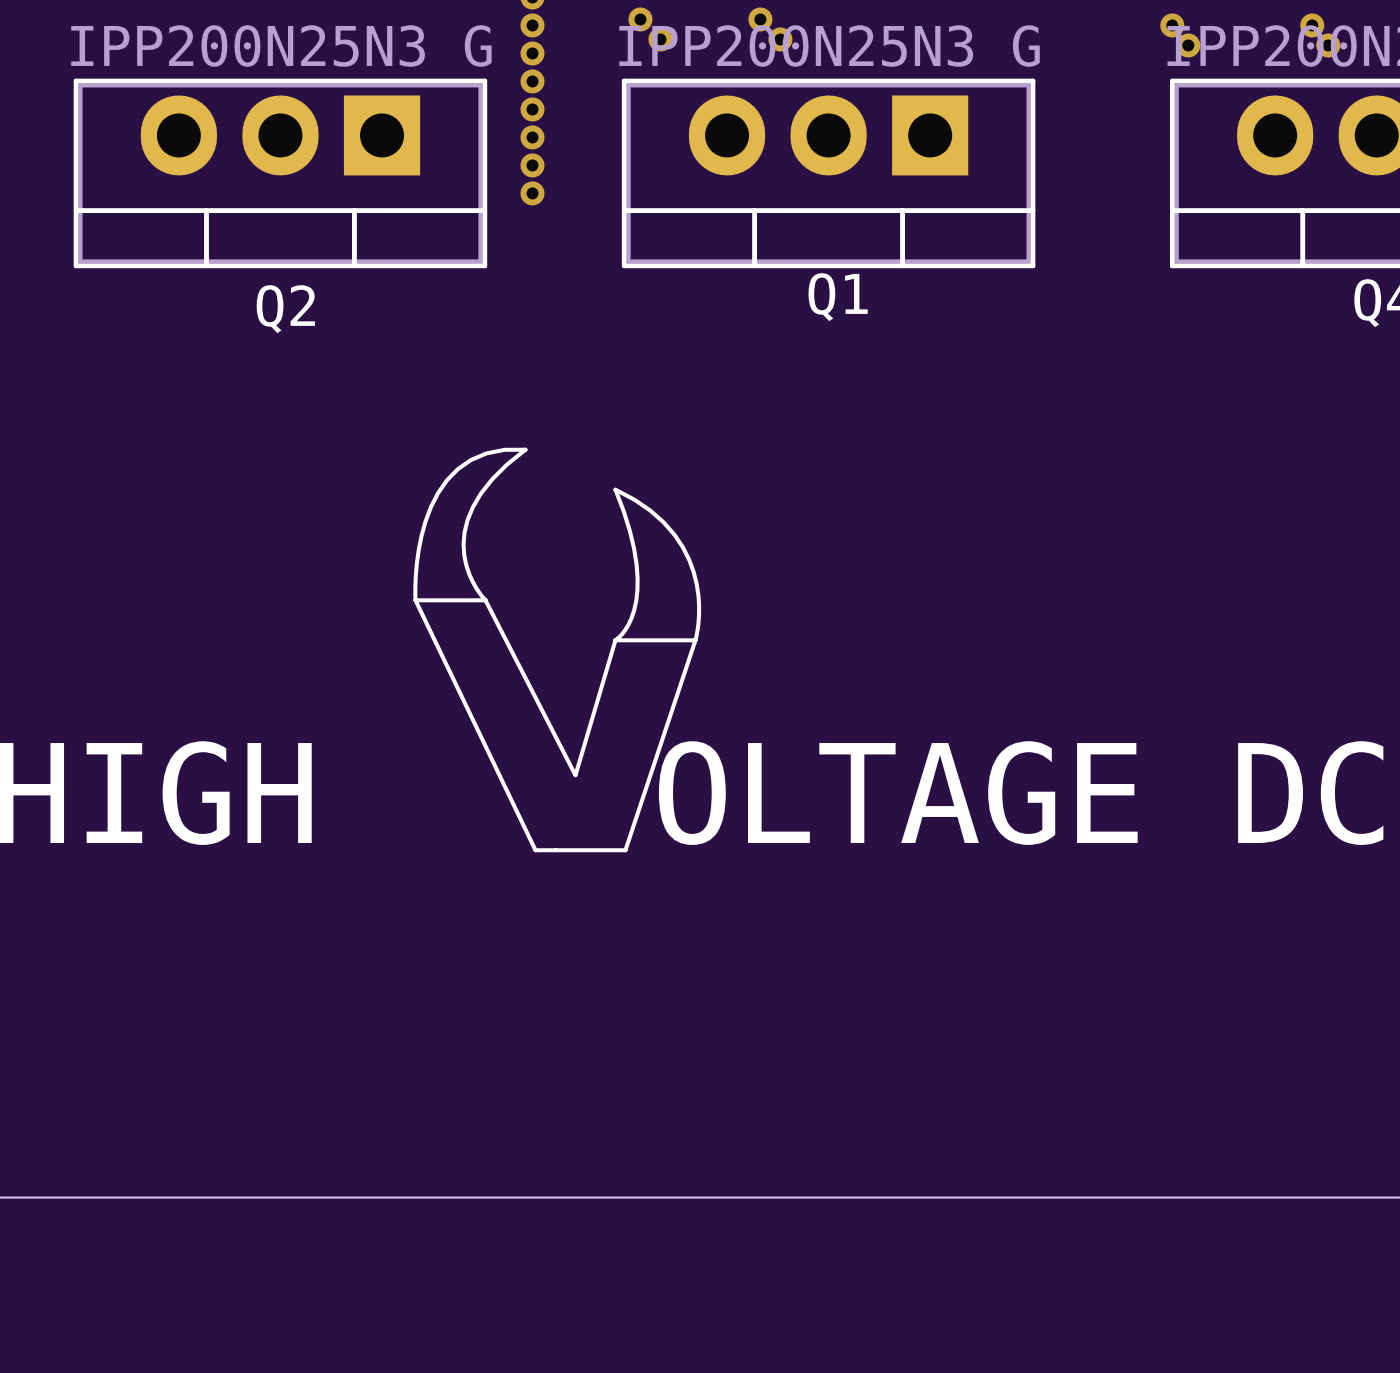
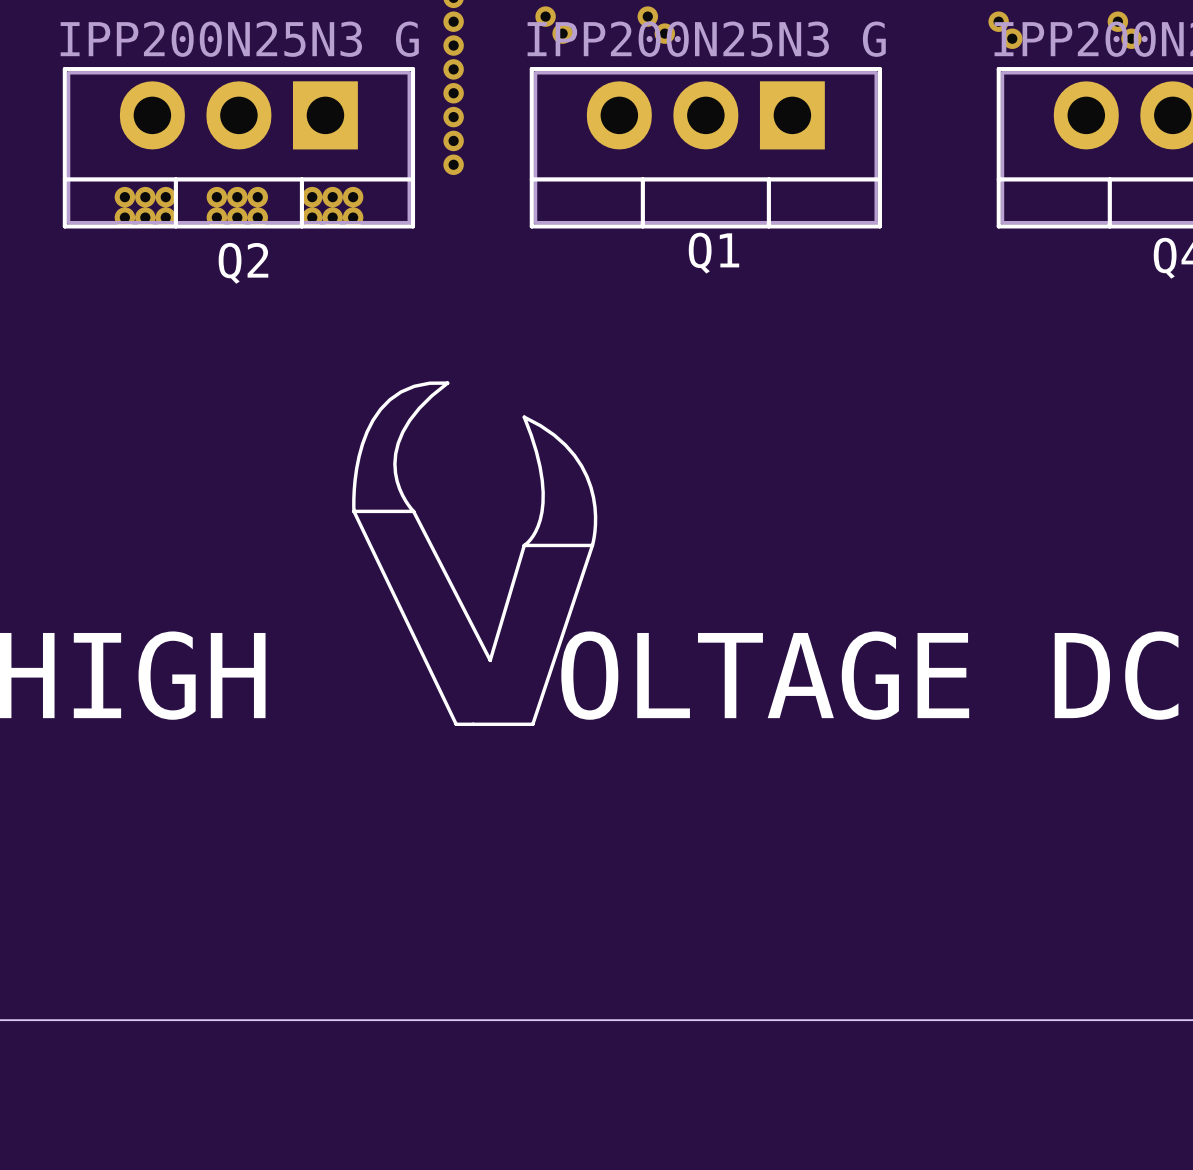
via: none -> (124, 197)
via: none -> (145, 197)
via: none -> (165, 197)
via: none -> (216, 197)
via: none -> (237, 197)
via: none -> (257, 197)
via: none -> (312, 197)
via: none -> (332, 197)
via: none -> (353, 197)
via: none -> (124, 217)
via: none -> (145, 217)
via: none -> (165, 217)
via: none -> (216, 217)
via: none -> (237, 217)
via: none -> (257, 217)
via: none -> (312, 217)
via: none -> (332, 217)
via: none -> (353, 217)

